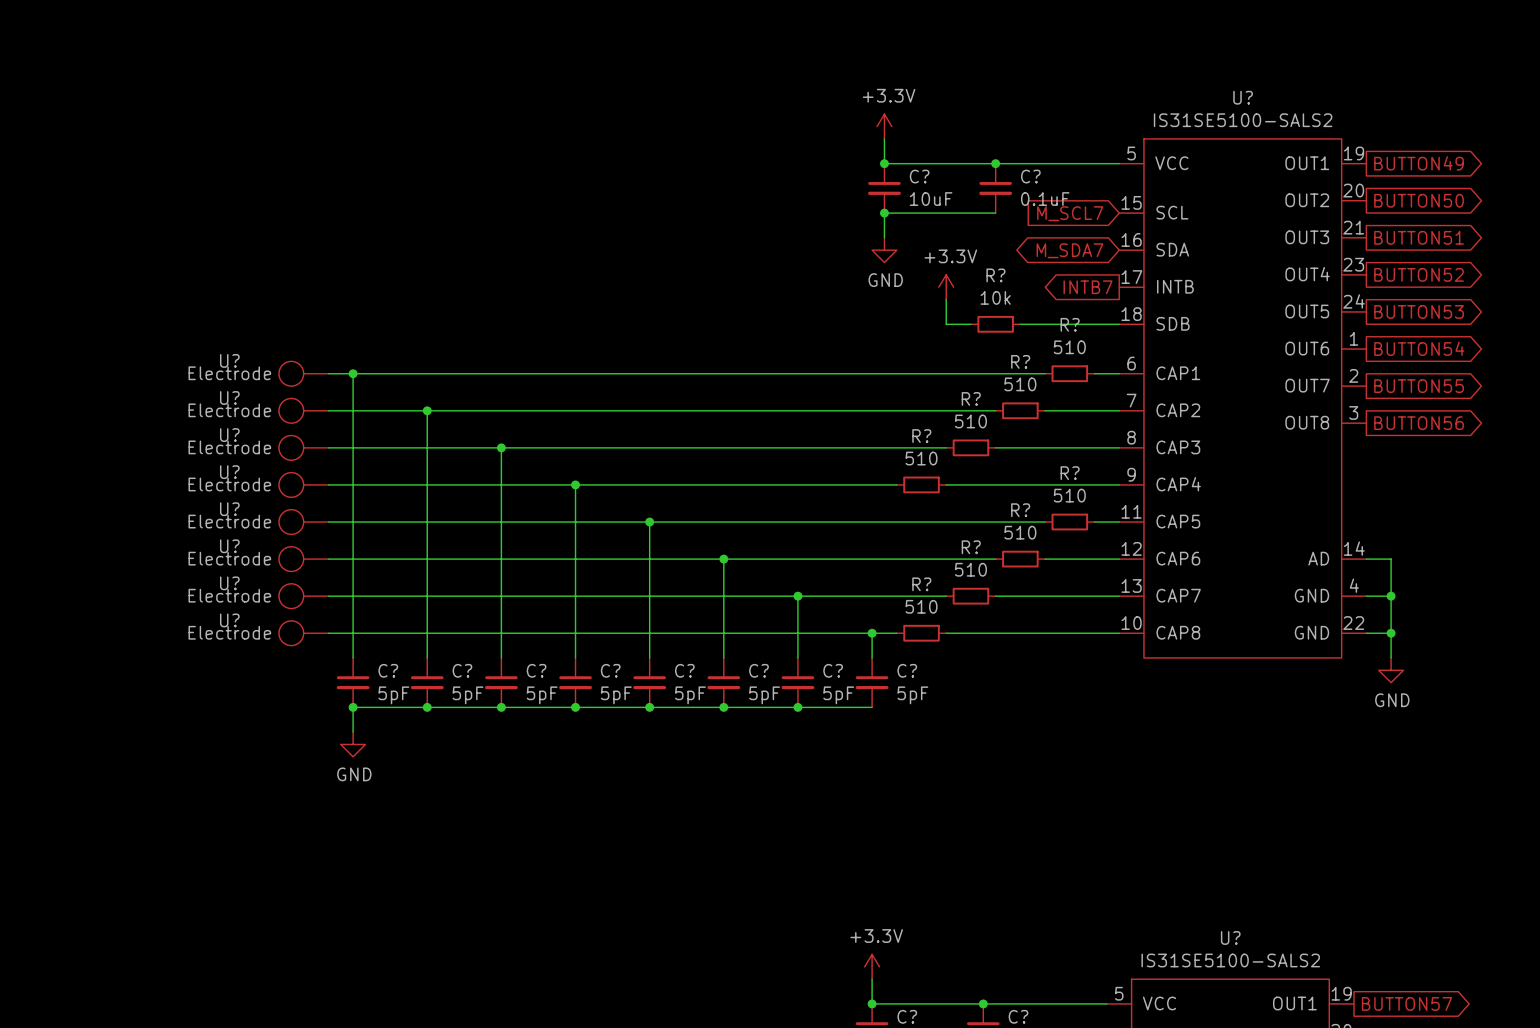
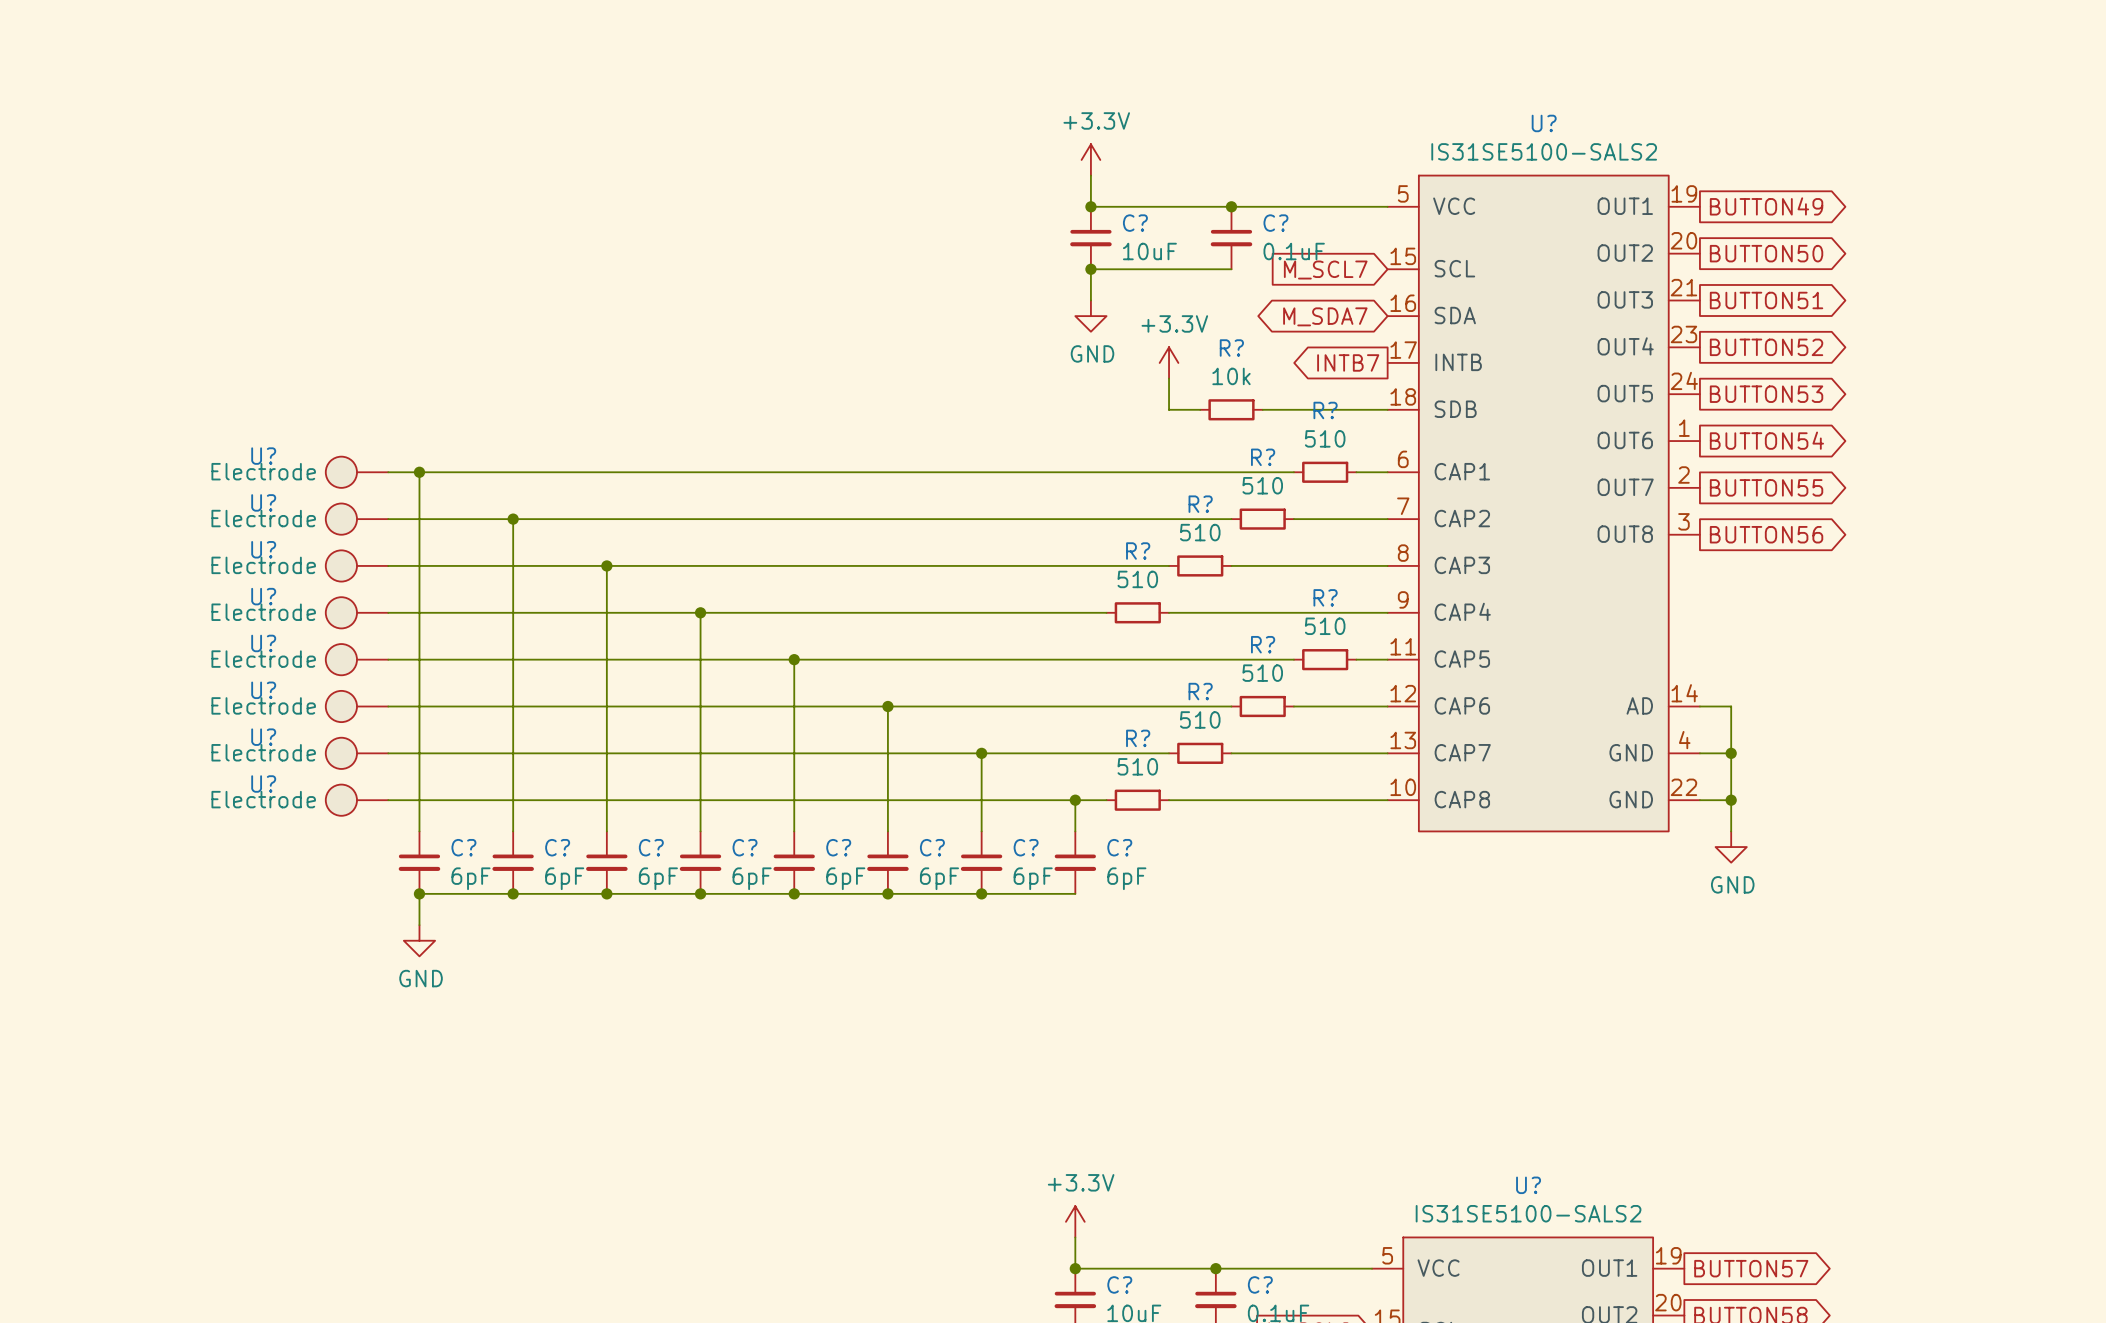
C? value: 5pF (393, 695) -> 6pF (471, 878)
C? value: 5pF (468, 695) -> 6pF (564, 878)
C? value: 5pF (542, 695) -> 6pF (658, 878)
C? value: 5pF (616, 695) -> 6pF (752, 878)
C? value: 5pF (690, 695) -> 6pF (845, 878)
C? value: 5pF (764, 695) -> 6pF (939, 878)
C? value: 5pF (838, 695) -> 6pF (1033, 878)
C? value: 5pF (912, 695) -> 6pF (1126, 878)

